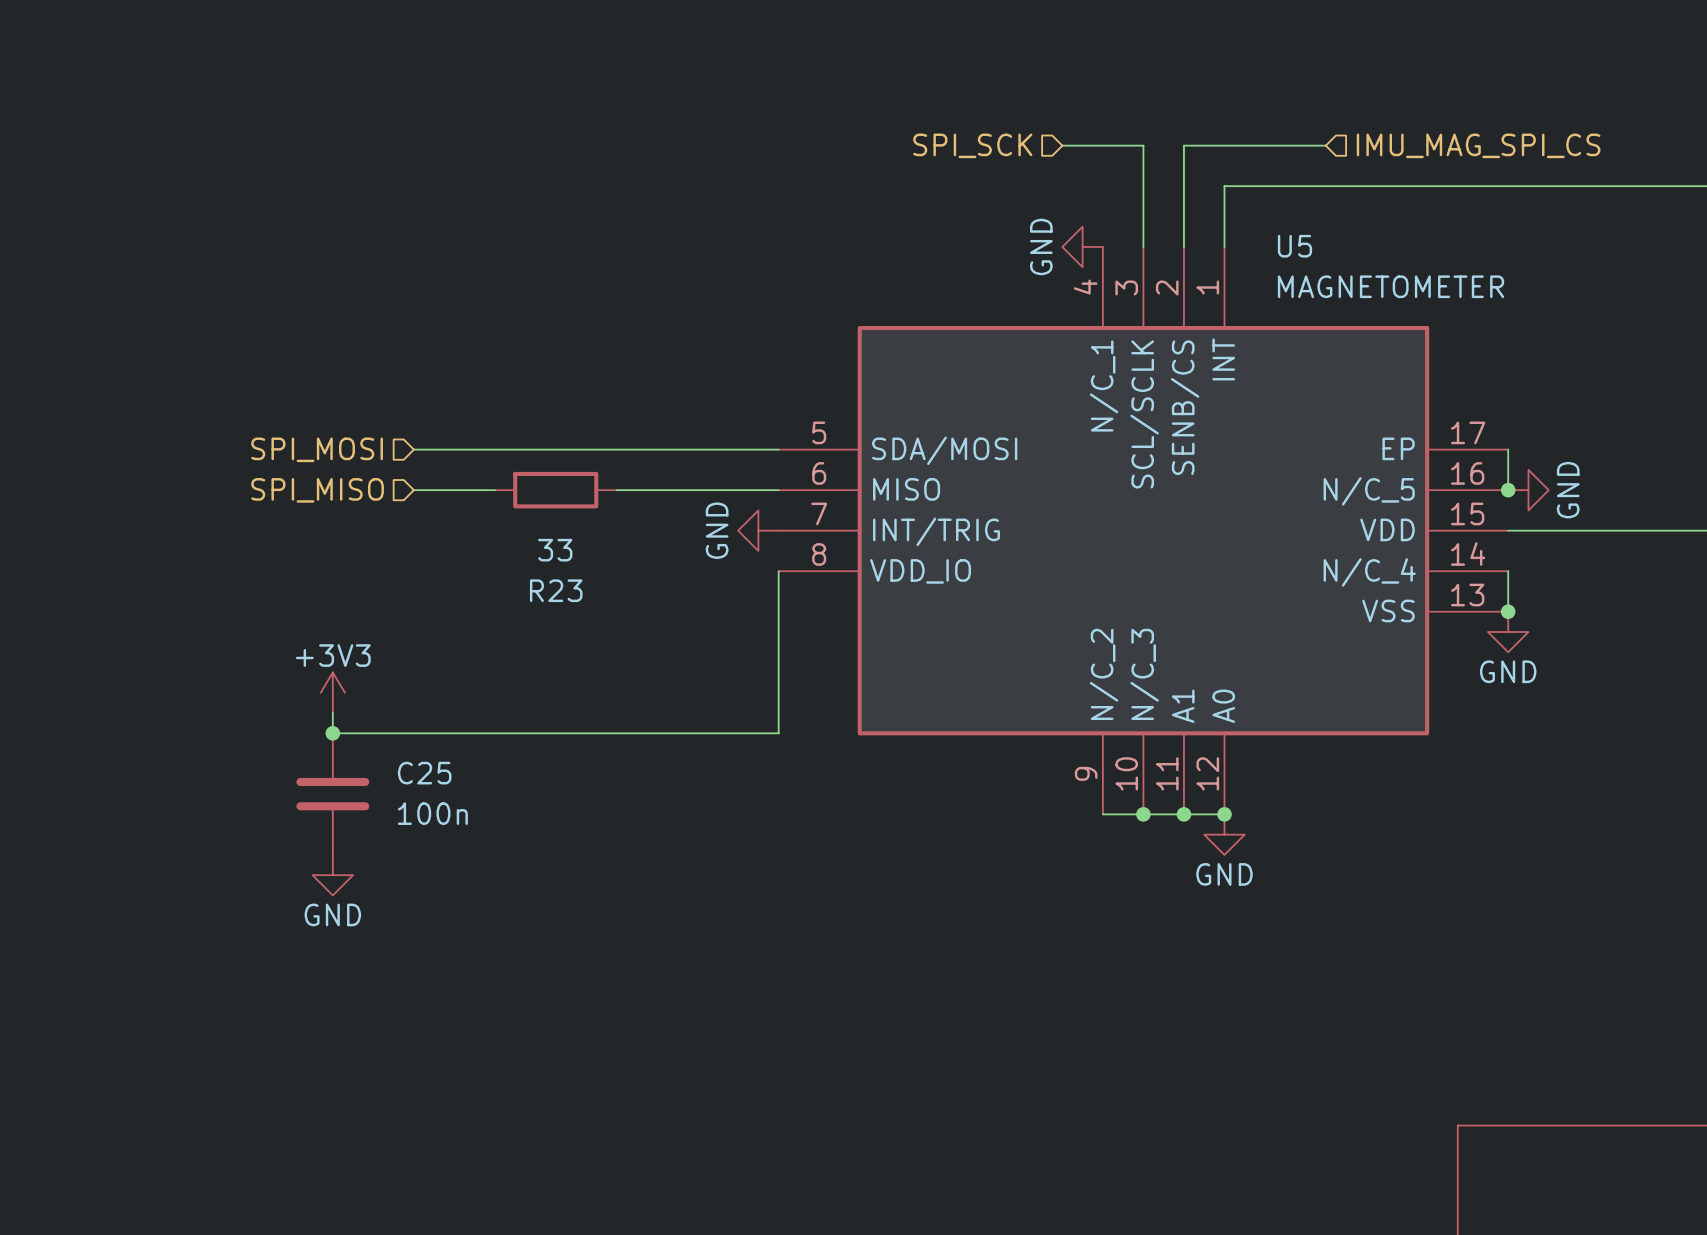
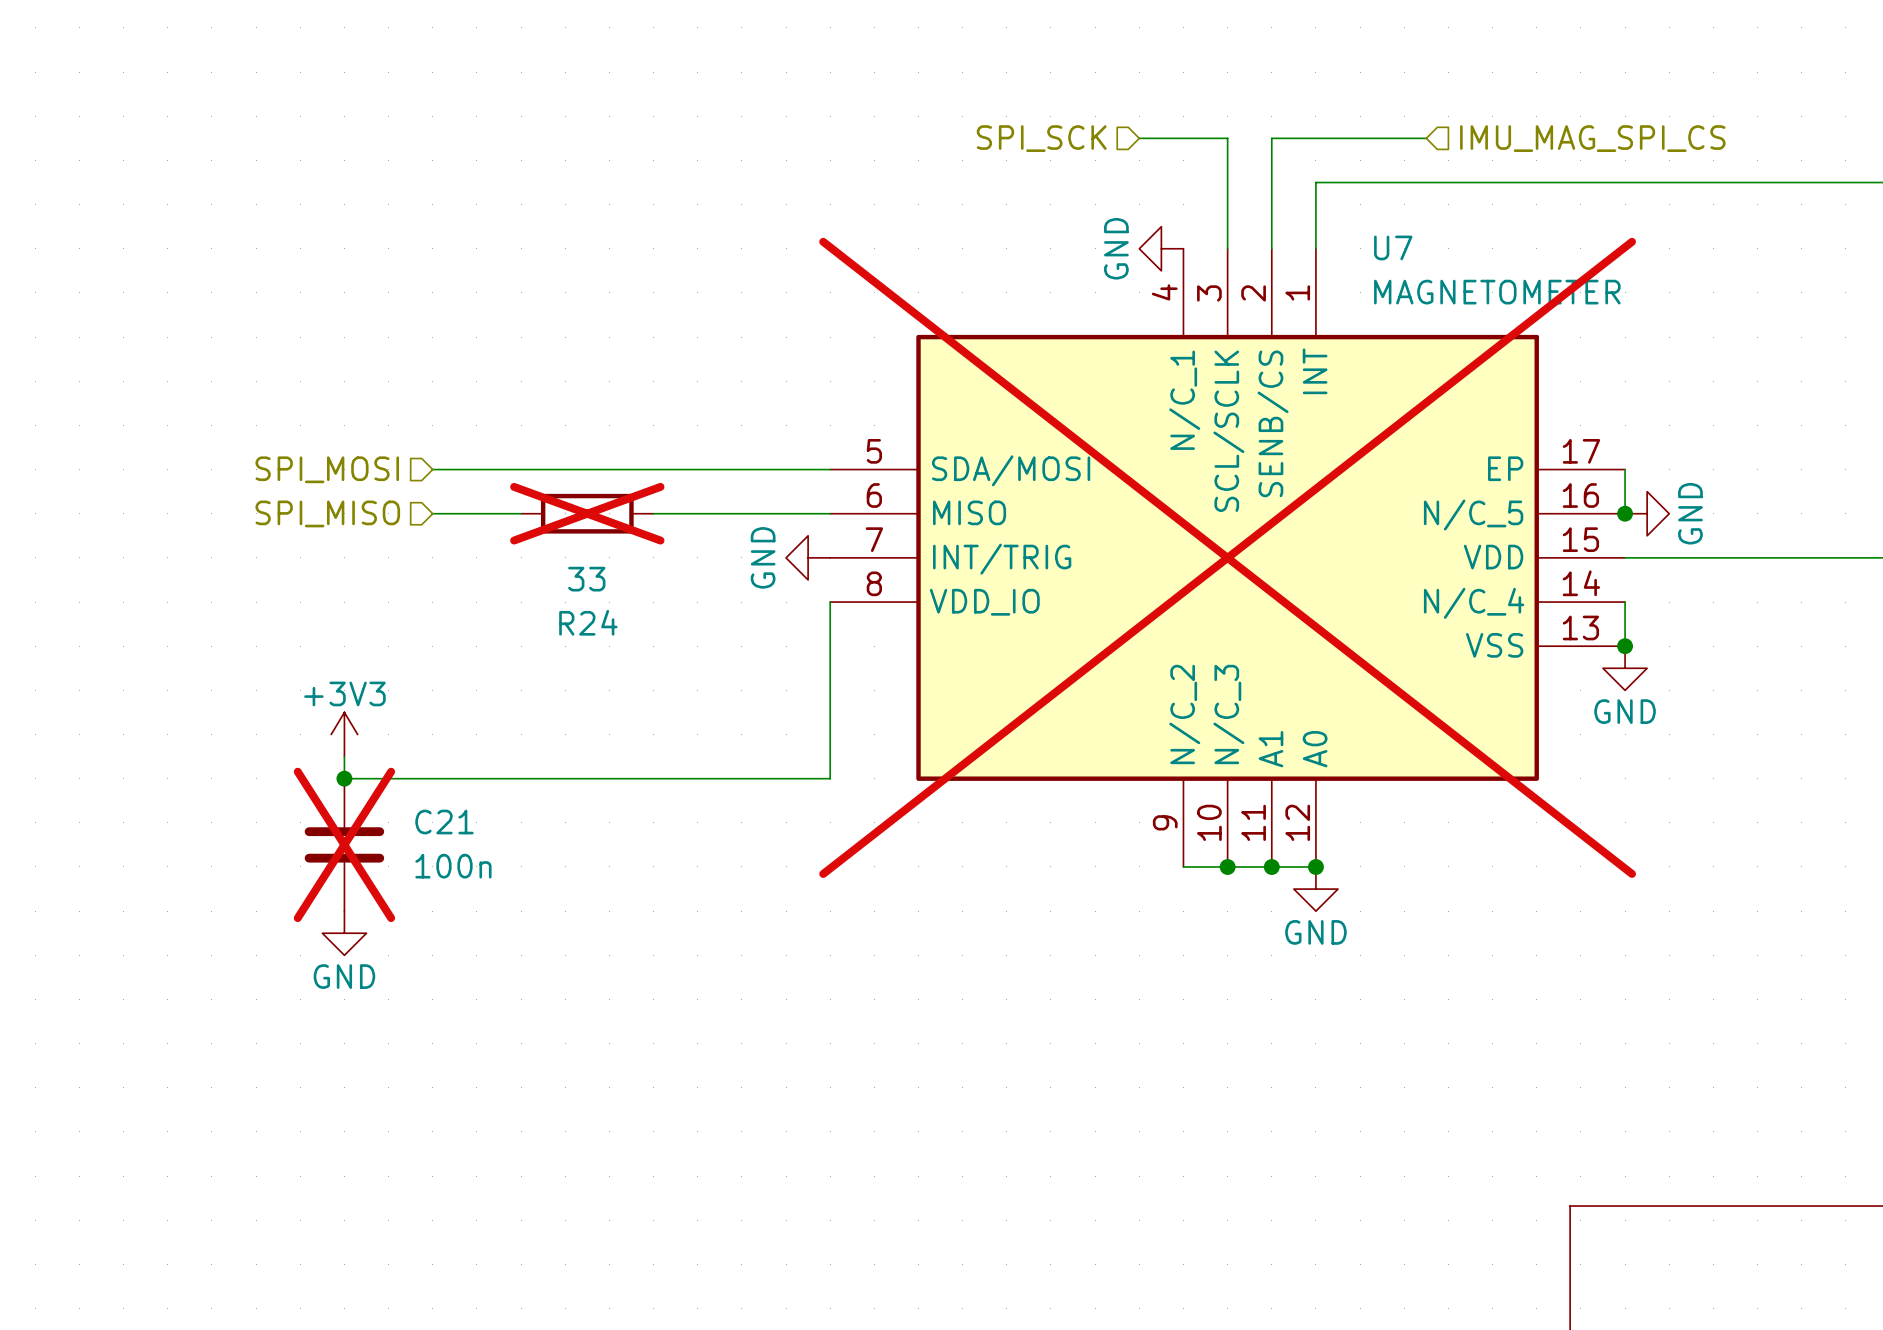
U5 name: U5 (1294, 246) -> U7 (1393, 247)
R23 do-not-place cross: none -> (587, 513)
U5 do-not-place cross: none -> (1227, 557)
R23 name: R23 (556, 590) -> R24 (588, 622)
C25 name: C25 (424, 773) -> C21 (444, 822)
C25 do-not-place cross: none -> (344, 844)

